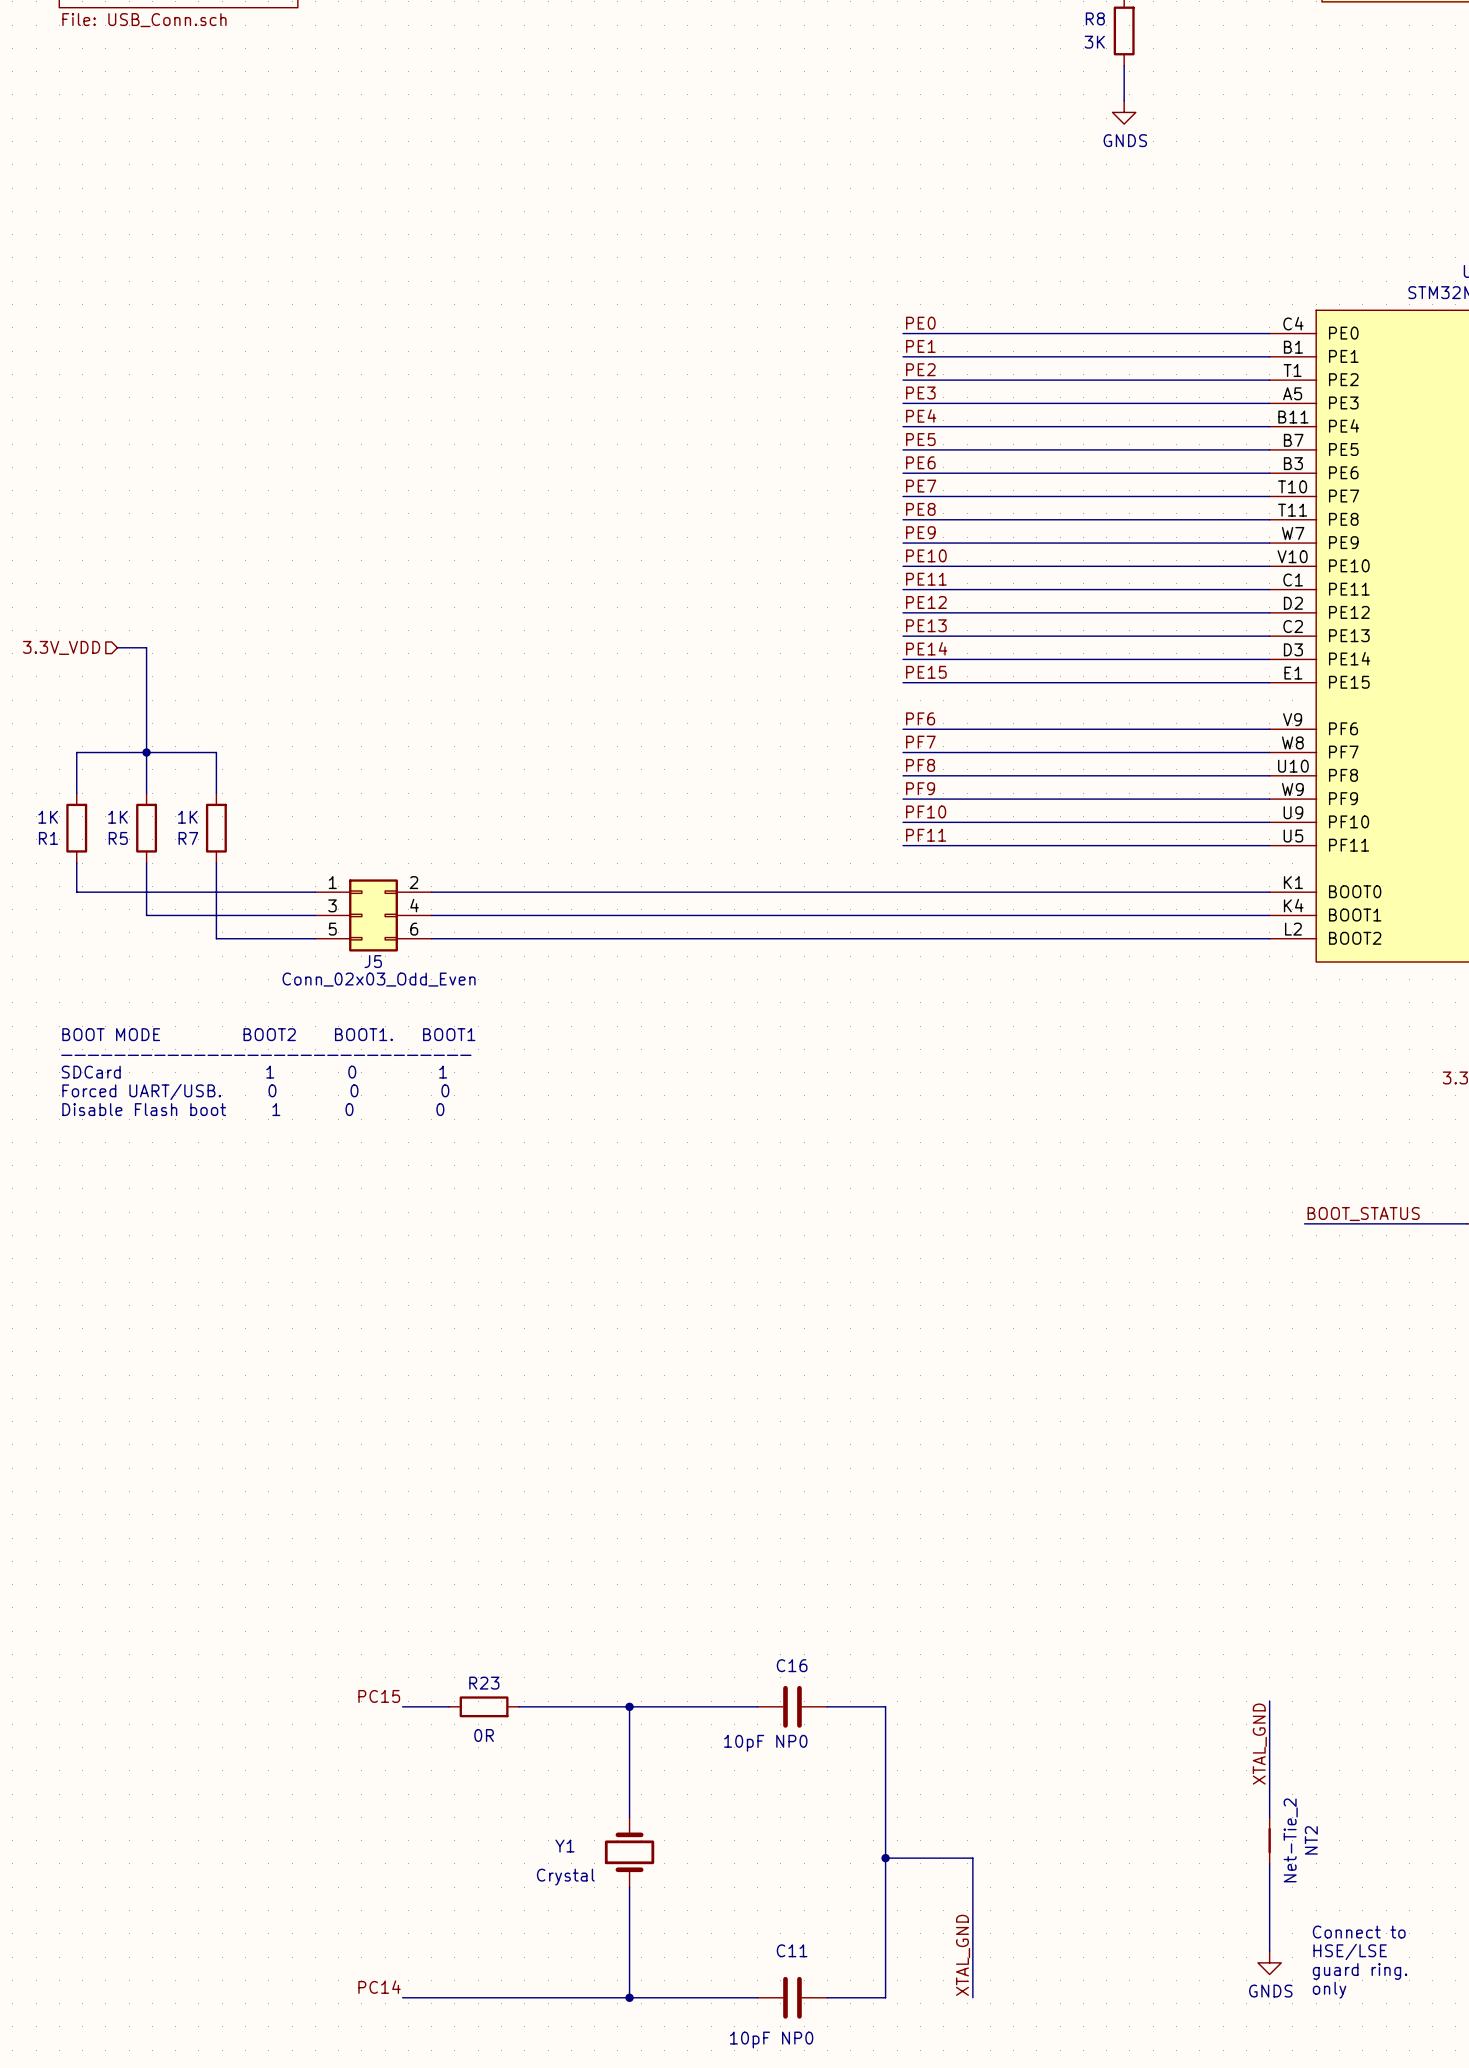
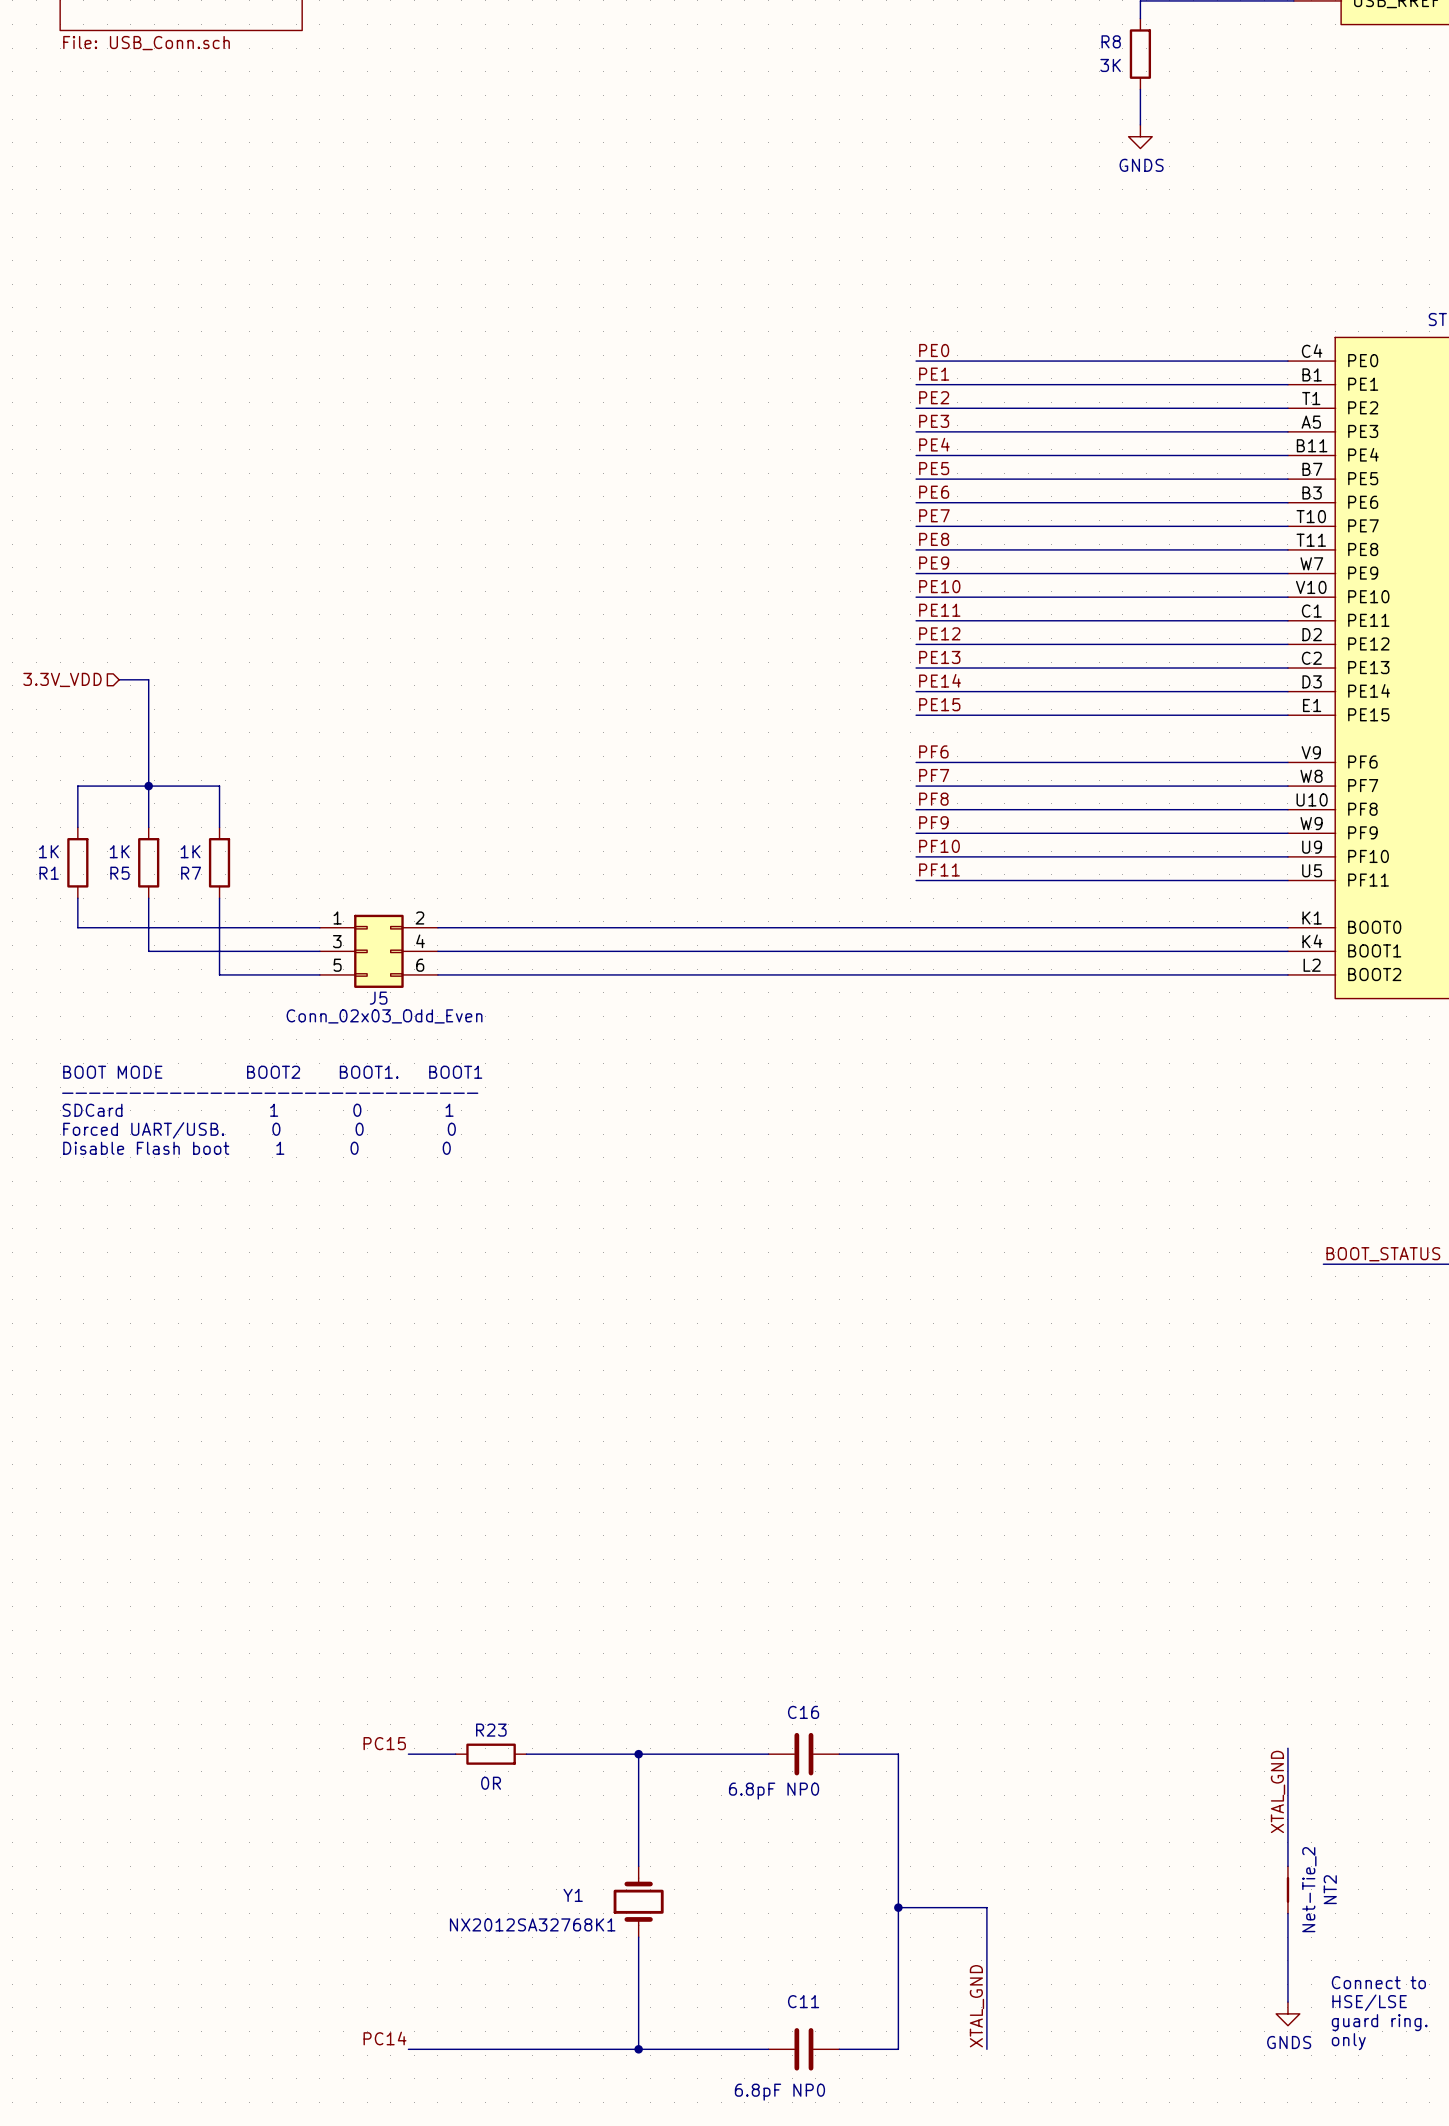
C16 value: 10pF NP0 (765, 1743) -> 6.8pF NP0 (774, 1791)
Y1 value: Crystal (565, 1877) -> NX2012SA32768K1 (532, 1924)
C11 value: 10pF NP0 (771, 2040) -> 6.8pF NP0 (779, 2092)

